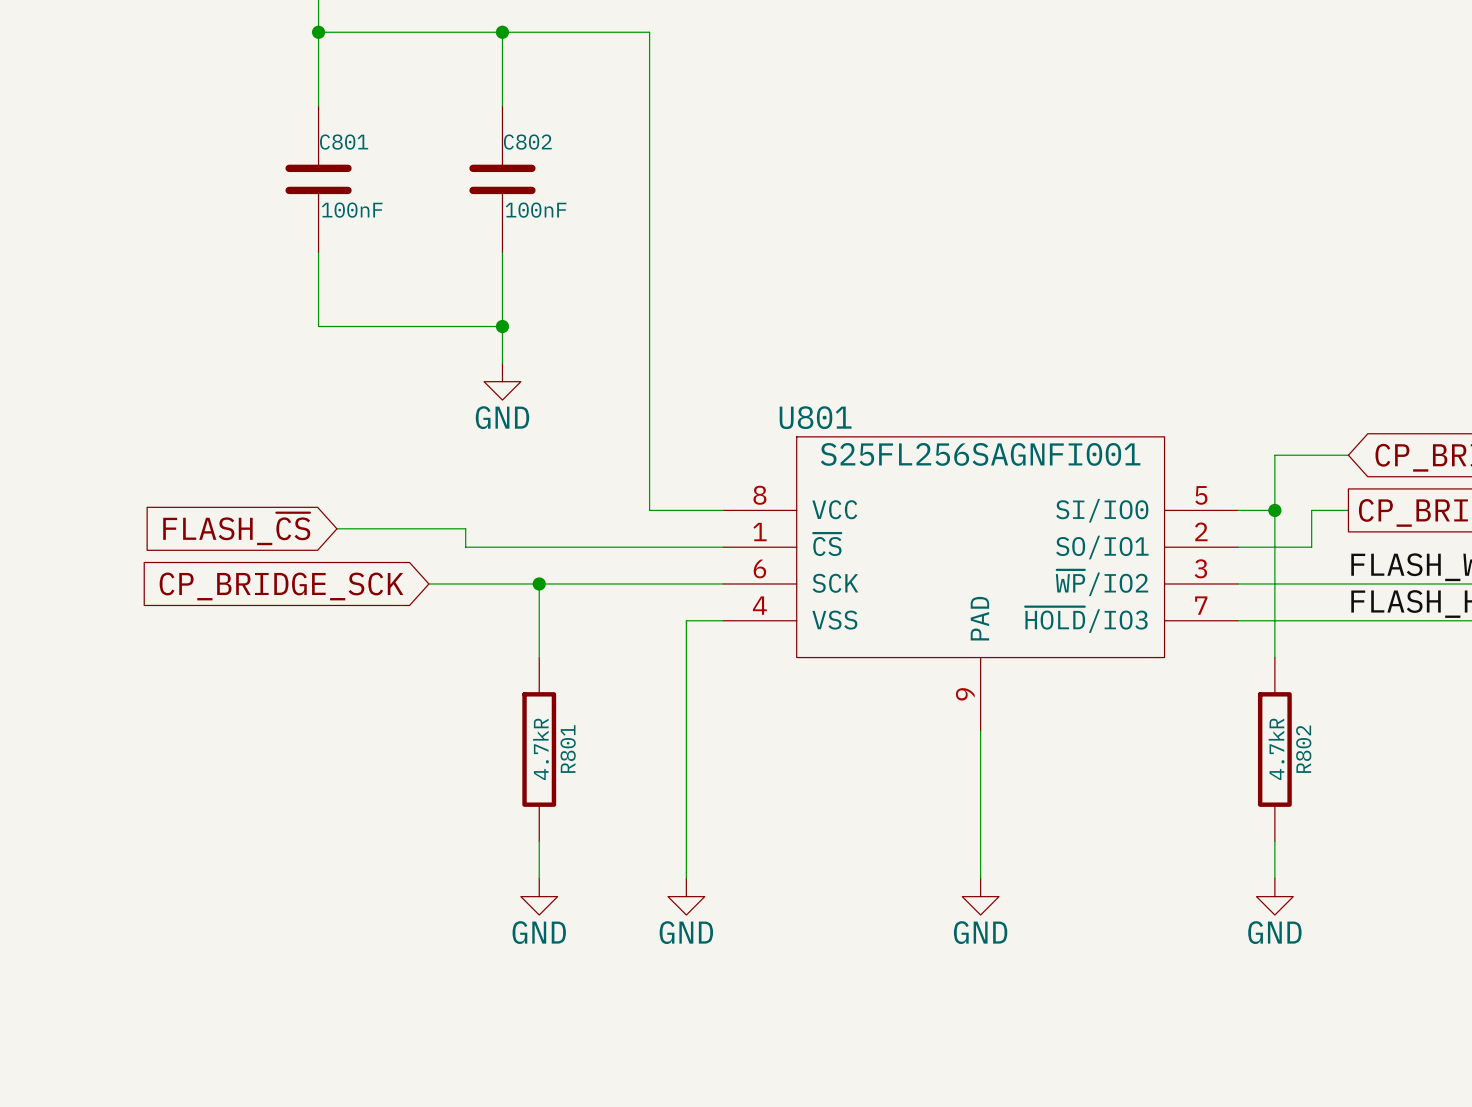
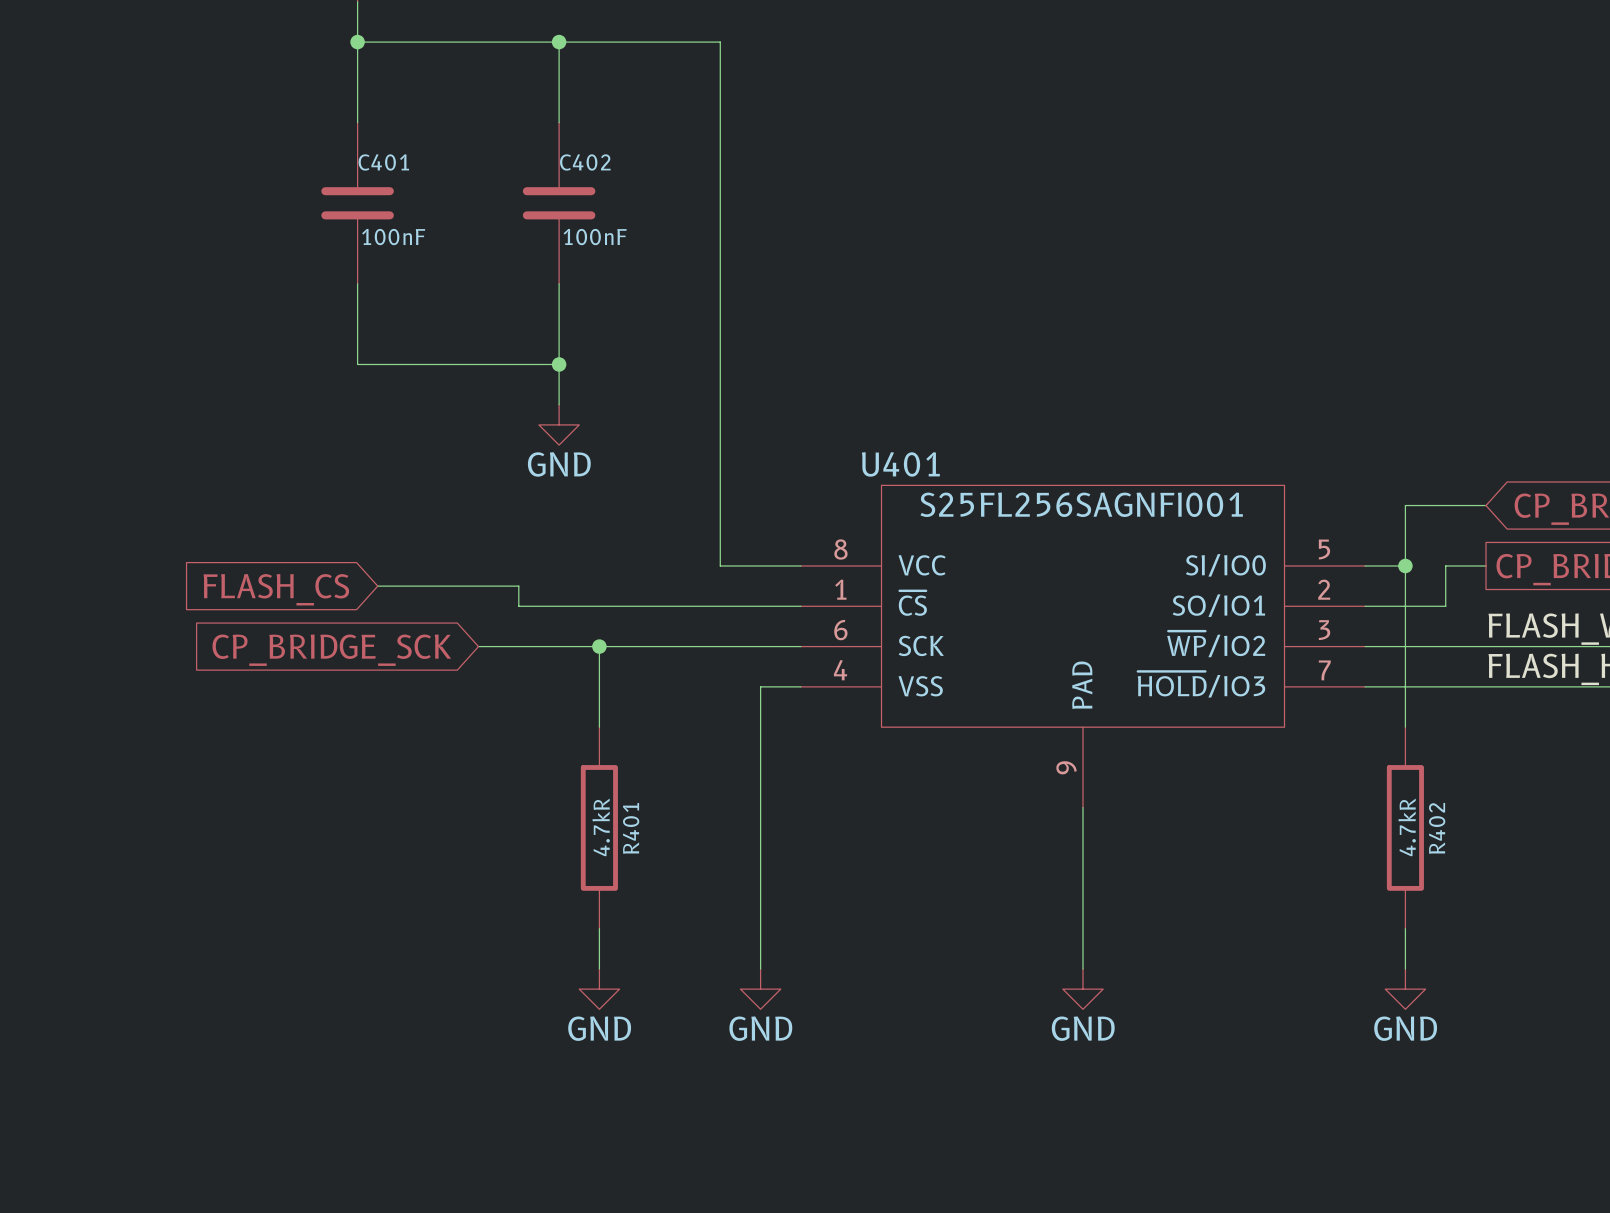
C801 name: C801 (344, 142) -> C401 (383, 162)
C802 name: C802 (527, 142) -> C402 (585, 162)
U801 name: U801 (815, 417) -> U401 (900, 464)
global label: FLASH_~{CS} (236, 528) -> FLASH_CS (276, 589)
R801 name: R801 (568, 749) -> R401 (631, 828)
R802 name: R802 (1303, 749) -> R402 (1437, 828)

